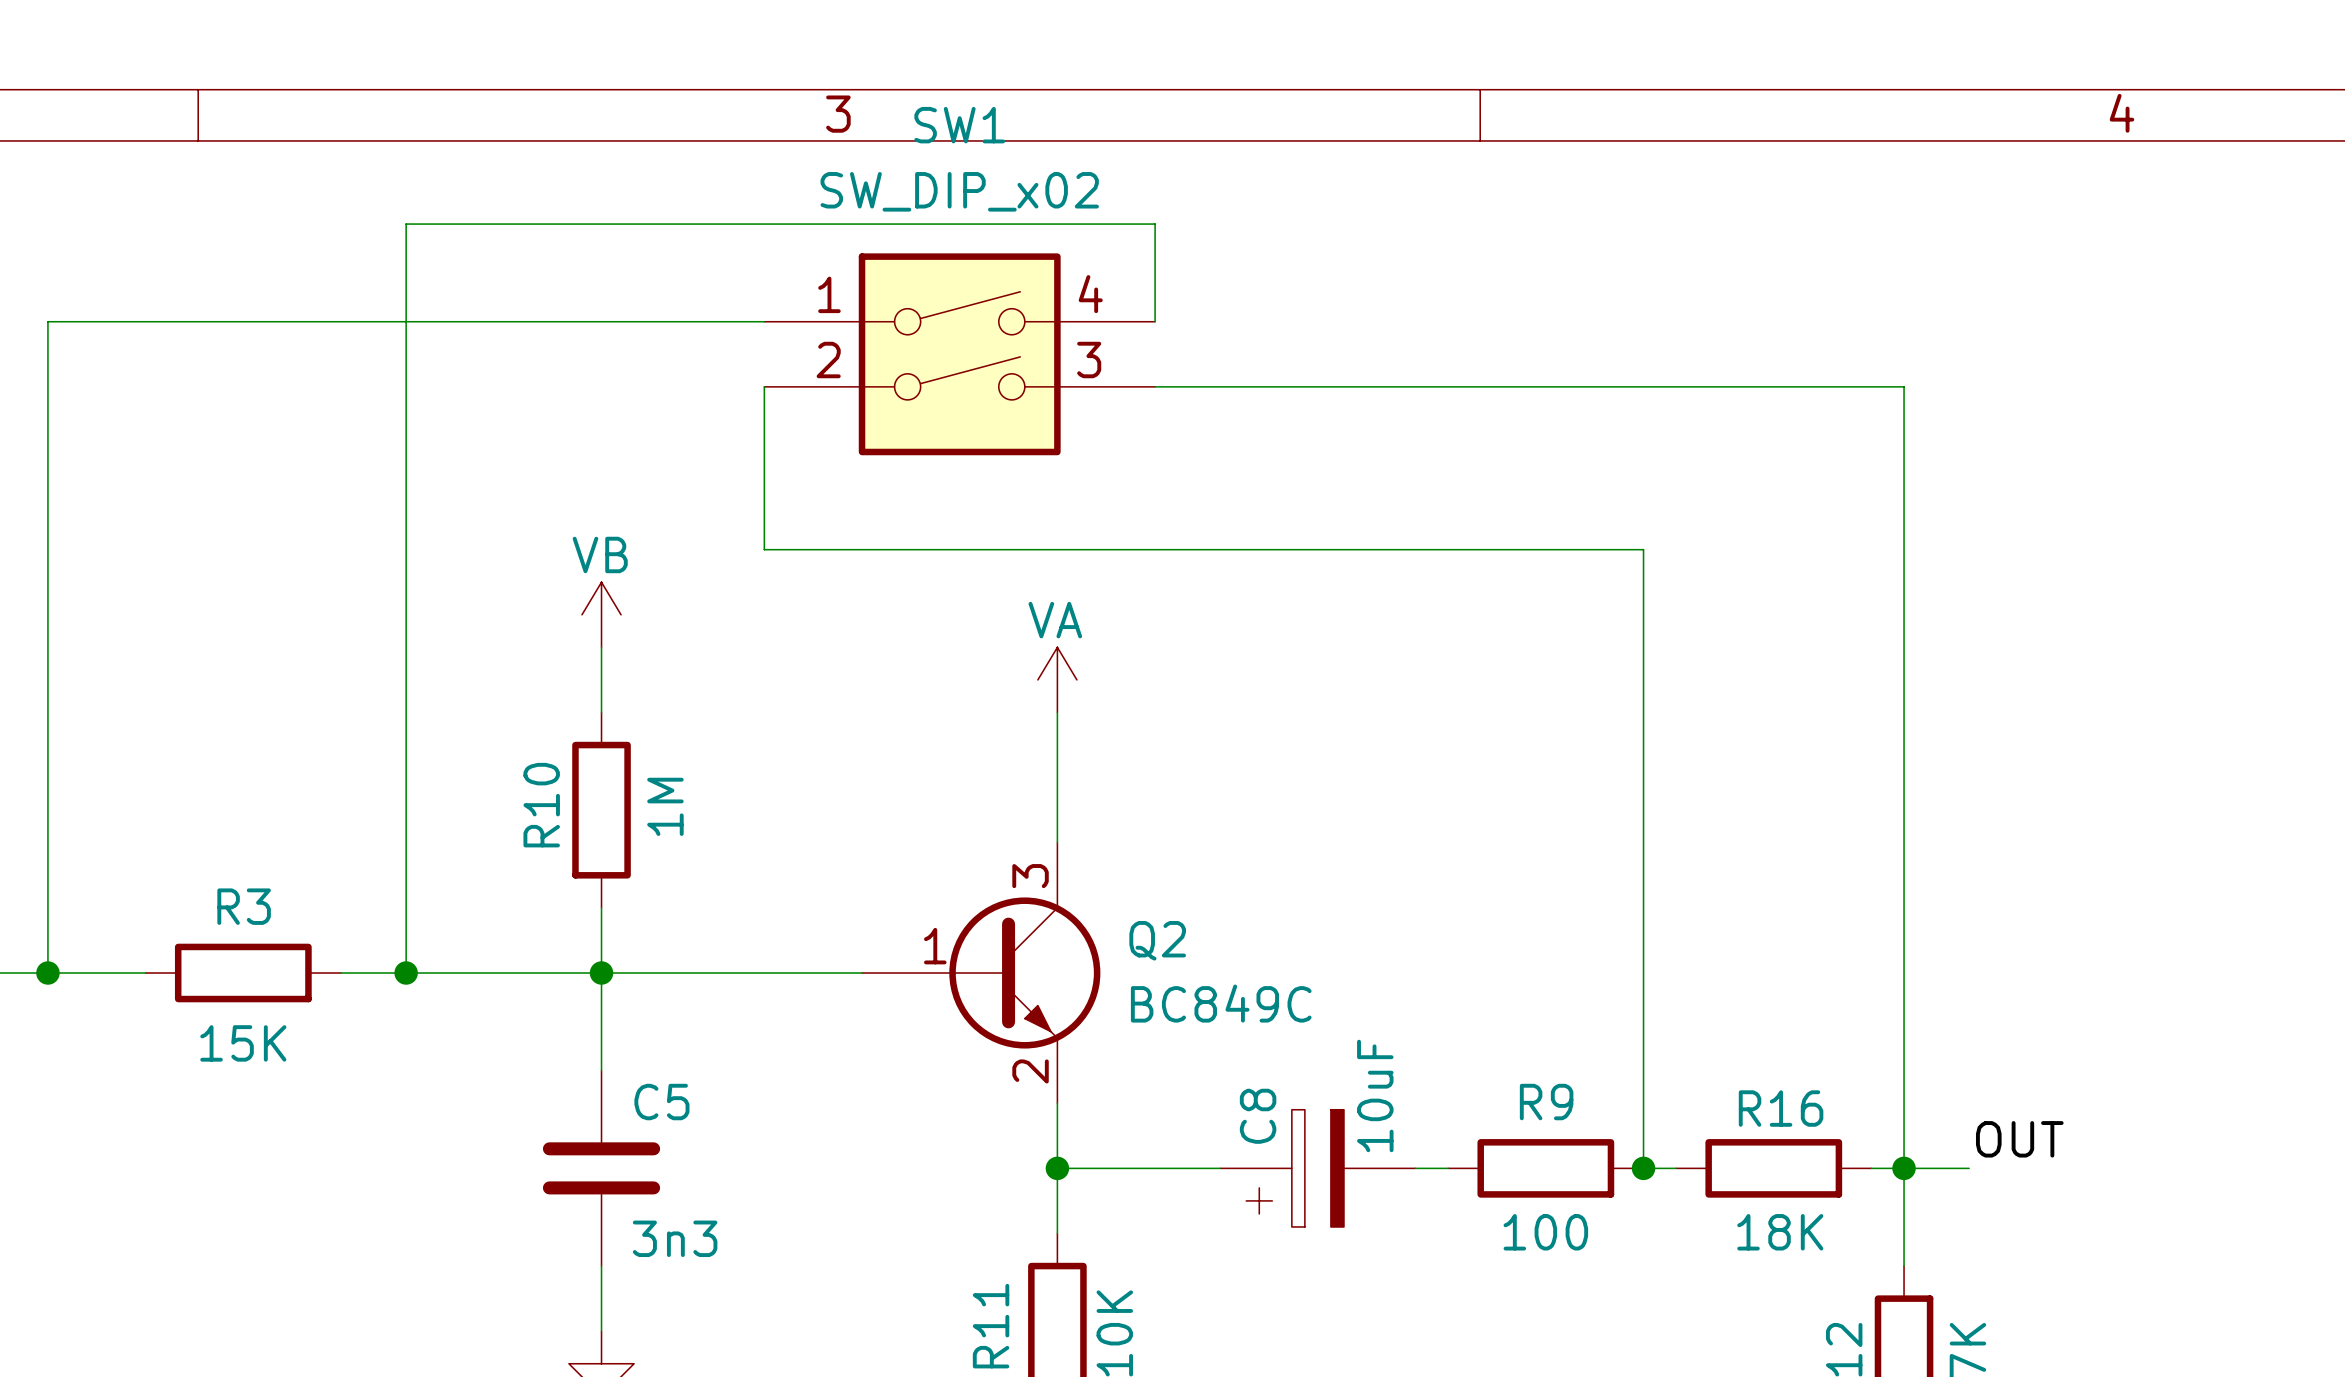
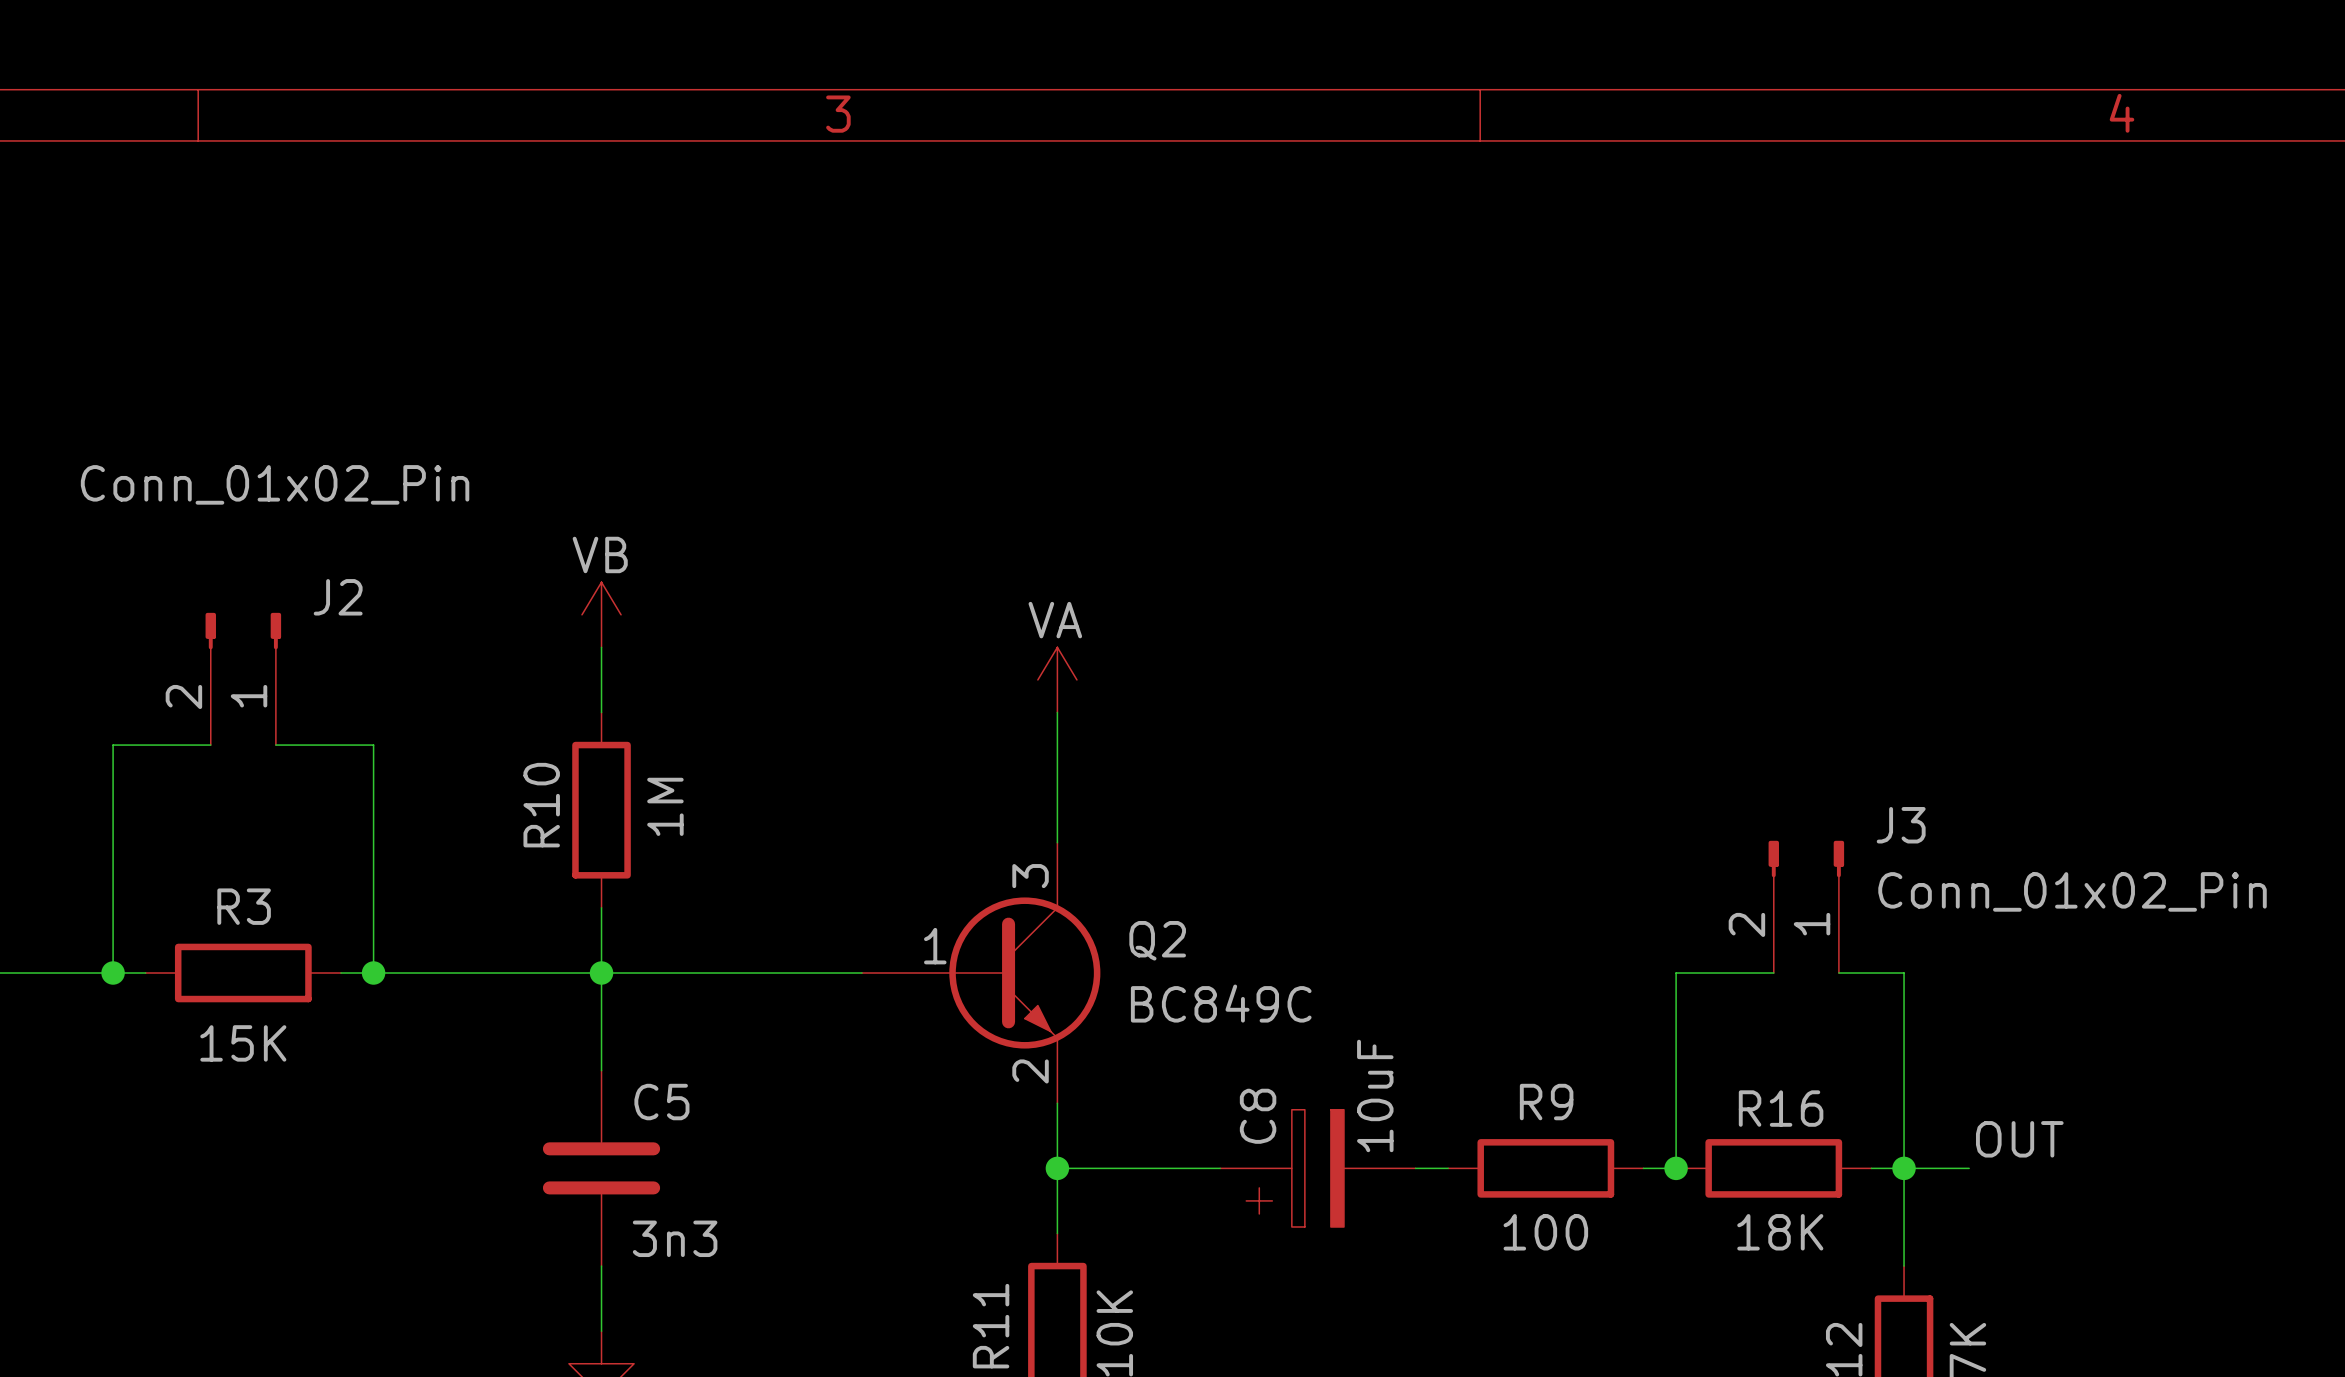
wire: (764, 321) (47, 321) (47, 973) -> none
wire: (1155, 321) (1155, 224) (406, 224) (406, 973) -> none
SW1: SW_DIP_x02 (959, 354) -> none
wire: (764, 386) (764, 549) (1643, 549) (1643, 1168) -> none
wire: (1155, 386) (1904, 386) (1904, 973) -> (1838, 973) (1904, 973)
J2: none -> Conn_01x02_Pin (243, 678)
wire: none -> (210, 745) (113, 745) (113, 973)
wire: none -> (275, 745) (373, 745) (373, 973)
J3: none -> Conn_01x02_Pin (1806, 906)
junction position: (47, 973) -> (113, 973)
junction position: (406, 973) -> (373, 973)
wire: none -> (1773, 973) (1676, 973) (1676, 1168)
junction position: (1643, 1168) -> (1676, 1168)

